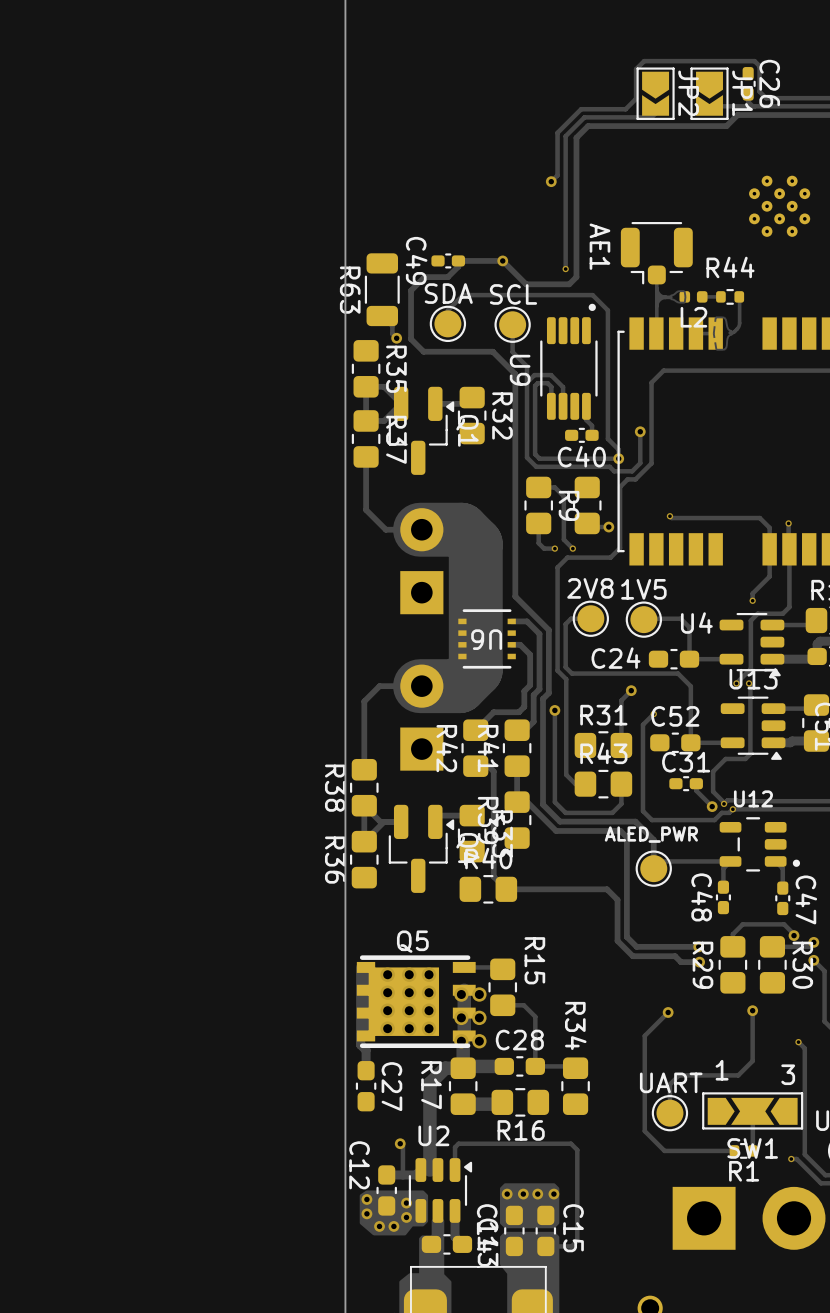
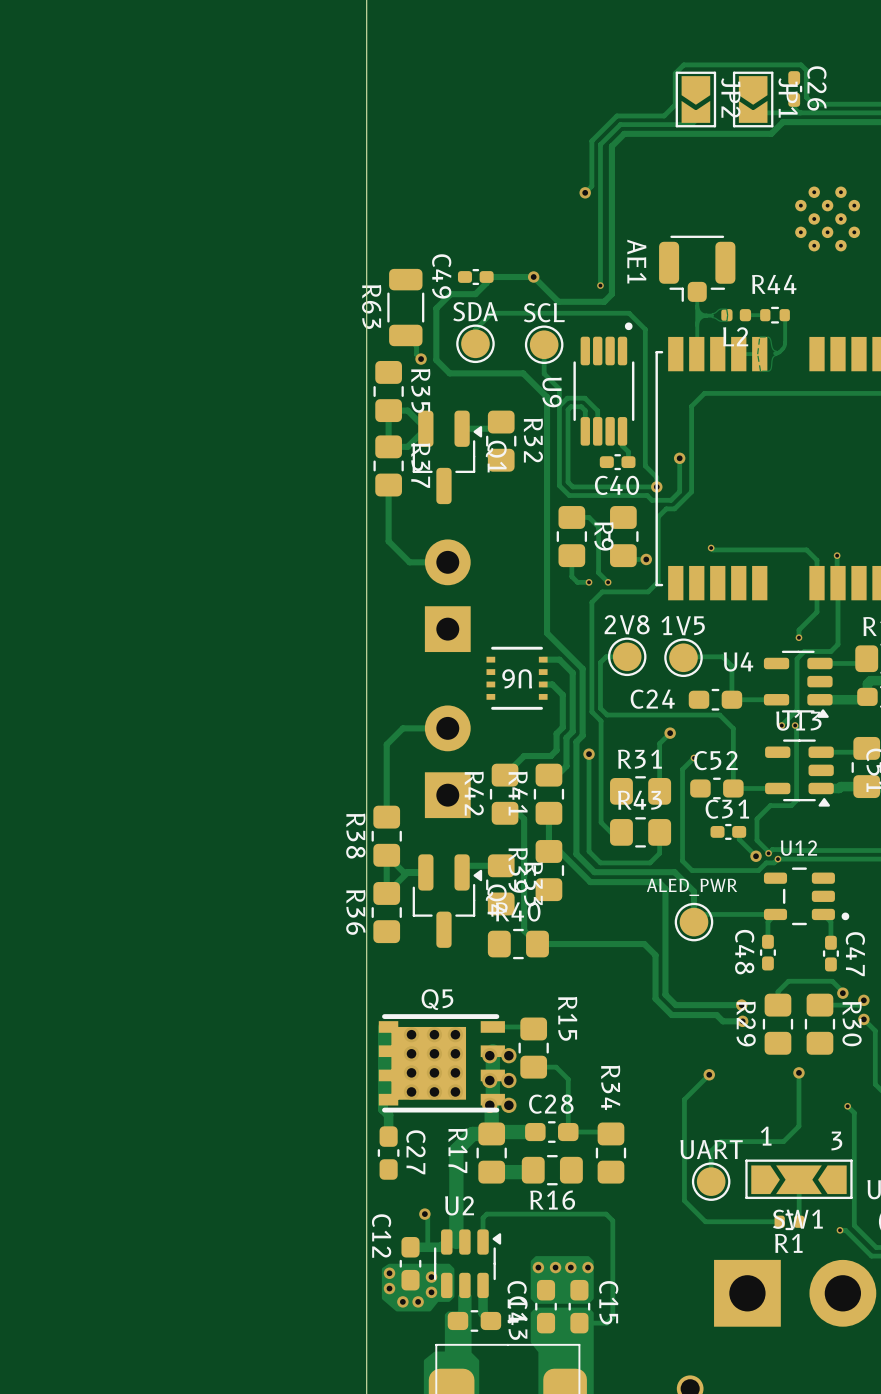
track: (420, 529) (461, 529) (475, 544) (475, 669) (459, 686) (420, 686) -> none

